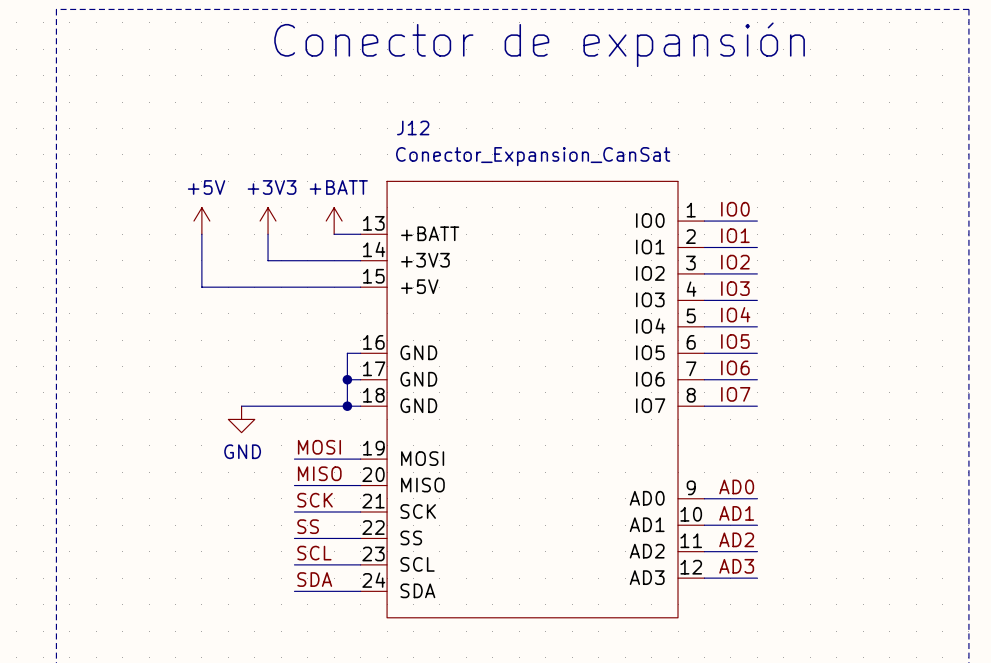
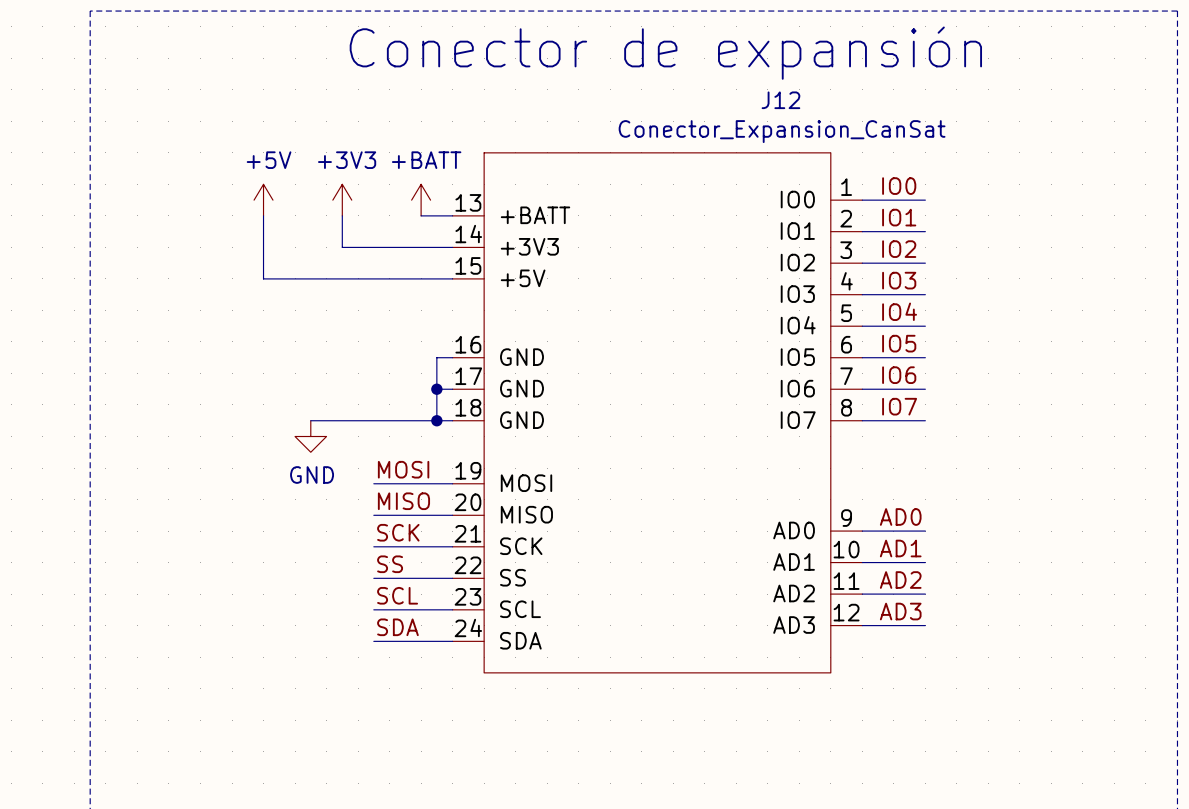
J12 name position: J12 (413, 127) -> J12 (780, 100)
J12 value position: Conector_Expansion_CanSat (533, 156) -> Conector_Expansion_CanSat (782, 131)
label: none -> IO0 (899, 186)
wire: none -> (862, 200) (925, 200)
wire: none -> (263, 215) (263, 278) (421, 278)
wire: none -> (421, 215) (452, 215)
label: none -> IO1 (899, 217)
wire: none -> (862, 231) (925, 231)
label: IO0 (735, 209) -> IO2 (899, 249)
power symbol position: +5V (201, 221) -> +5V (263, 200)
power symbol position: +3V3 (268, 221) -> +3V3 (342, 200)
power symbol position: +BATT (334, 221) -> +BATT (421, 200)
wire: (201, 234) (201, 287) (360, 287) -> none
wire: (268, 234) (268, 260) (360, 260) -> (342, 215) (342, 247) (452, 247)
label: IO1 (735, 235) -> IO3 (899, 280)
label: IO2 (735, 262) -> IO4 (899, 311)
label: IO3 (735, 288) -> IO5 (899, 343)
wire: none -> (452, 357) (436, 357) (436, 420) (310, 420)
label: IO4 (735, 314) -> IO6 (899, 375)
junction: none -> (436, 389)
label: IO5 (735, 341) -> IO7 (899, 406)
wire: (347, 353) (347, 406) -> none
junction: none -> (436, 420)
label: IO6 (735, 367) -> none
wire: (347, 379) (360, 379) -> (436, 389) (452, 389)
junction: (347, 379) -> none
wire: (704, 379) (757, 379) -> (862, 531) (925, 531)
label: none -> MOSI (403, 469)
label: IO7 (735, 394) -> none
wire: (241, 406) (294, 406) -> none
junction: (347, 406) -> none
J12 position: (638, 406) -> (783, 420)
wire: (704, 406) (757, 406) -> (862, 562) (925, 562)
power symbol position: GND (241, 419) -> GND (310, 436)
label: none -> MISO (403, 501)
label: none -> AD0 (900, 516)
label: MOSI (319, 447) -> SCK (398, 532)
label: none -> AD1 (900, 548)
label: MISO (319, 473) -> SS (390, 564)
label: AD0 (736, 486) -> AD2 (900, 580)
label: SCK (315, 500) -> SCL (397, 595)
label: AD1 (736, 513) -> AD3 (900, 611)
label: SS (308, 526) -> SDA (397, 627)
label: AD2 (736, 539) -> none
wire: (704, 551) (757, 551) -> none
label: SCL (314, 553) -> none
wire: (294, 564) (360, 564) -> (373, 515) (452, 515)
label: AD3 (736, 566) -> none
wire: (704, 578) (757, 578) -> none
label: SDA (314, 579) -> none
wire: (294, 591) (360, 591) -> none

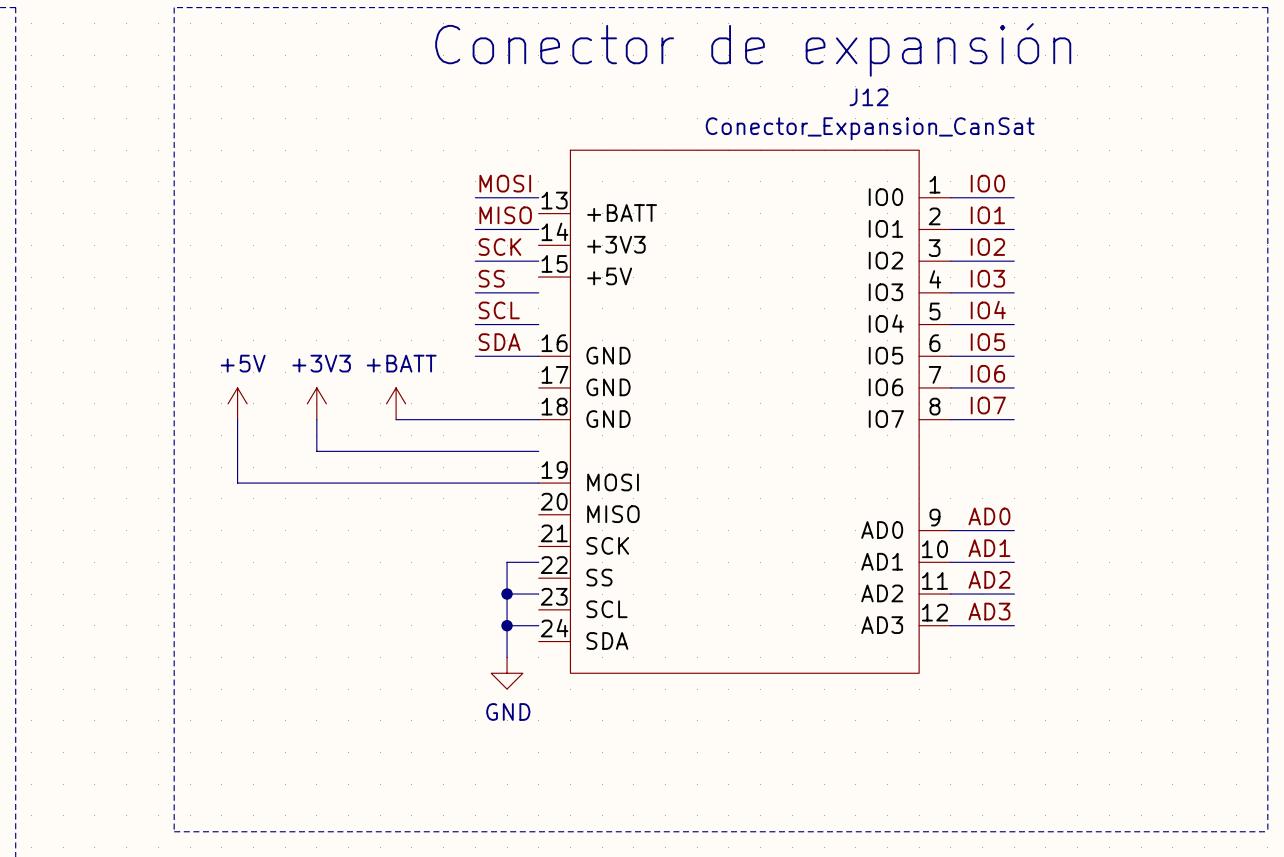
power symbol position: +5V (263, 200) -> +5V (237, 403)
power symbol position: +3V3 (342, 200) -> +3V3 (316, 403)
wire: none -> (475, 197) (538, 197)
power symbol position: +BATT (421, 200) -> +BATT (396, 403)
wire: (263, 215) (263, 278) (452, 278) -> none
wire: (342, 215) (342, 247) (452, 247) -> none
wire: (421, 215) (452, 215) -> none
wire: none -> (475, 229) (538, 229)
wire: none -> (475, 261) (538, 261)
wire: none -> (475, 292) (538, 292)
wire: none -> (475, 324) (538, 324)
wire: (436, 357) (436, 420) -> (522, 356) (475, 356)
wire: (436, 389) (452, 389) -> none
junction: (436, 389) -> none
wire: none -> (237, 419) (237, 483) (459, 483)
wire: none -> (316, 419) (316, 451) (538, 451)
junction: (436, 420) -> none
power symbol position: GND (310, 436) -> GND (507, 673)
label position: MOSI (403, 469) -> MOSI (505, 183)
label position: MISO (403, 501) -> MISO (505, 215)
wire: (373, 515) (452, 515) -> none
label position: SCK (398, 532) -> SCK (499, 247)
wire: (373, 546) (452, 546) -> none
wire: none -> (538, 562) (507, 562) (507, 657)
label position: SS (390, 564) -> SS (491, 278)
wire: (373, 578) (452, 578) -> none
wire: none -> (507, 594) (538, 594)
junction: none -> (507, 594)
label position: SCL (397, 595) -> SCL (499, 310)
wire: (373, 609) (452, 609) -> none
wire: none -> (507, 625) (538, 625)
junction: none -> (507, 625)
label position: SDA (397, 627) -> SDA (499, 342)
wire: (373, 641) (452, 641) -> none

